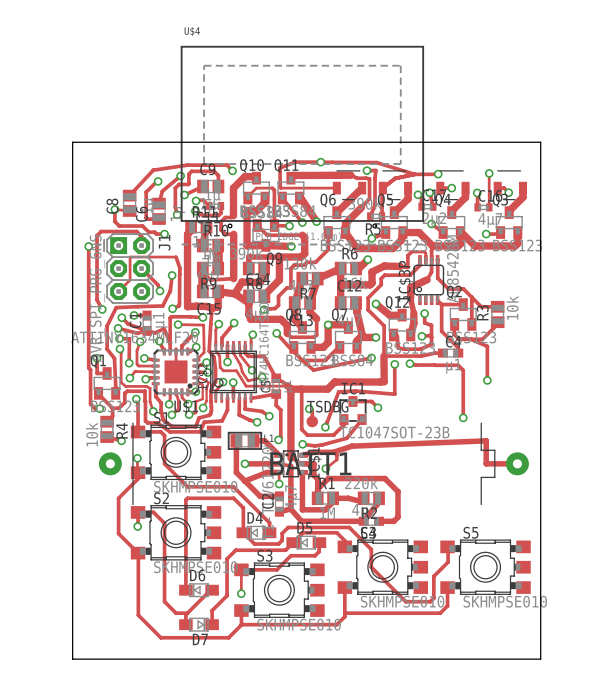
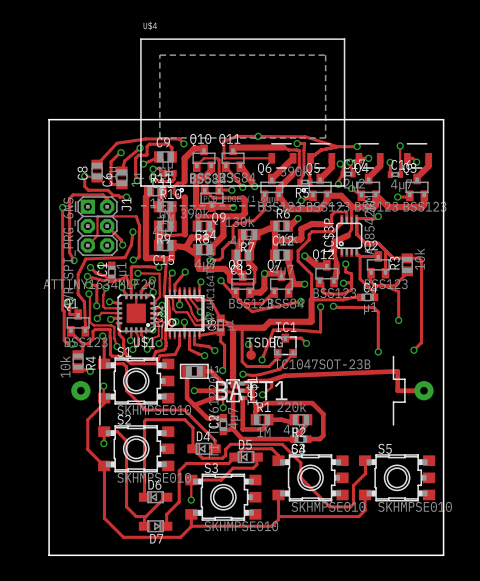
track: none -> (343, 174) (338, 184)
via: none -> (338, 184)
track: none -> (378, 216) (376, 218) (356, 218) (356, 234) (365, 243) (378, 243) (393, 258) (418, 258) (421, 260) (421, 342) (413, 350)
via: none -> (378, 216)
via: none -> (134, 282)
via: none -> (413, 350)

